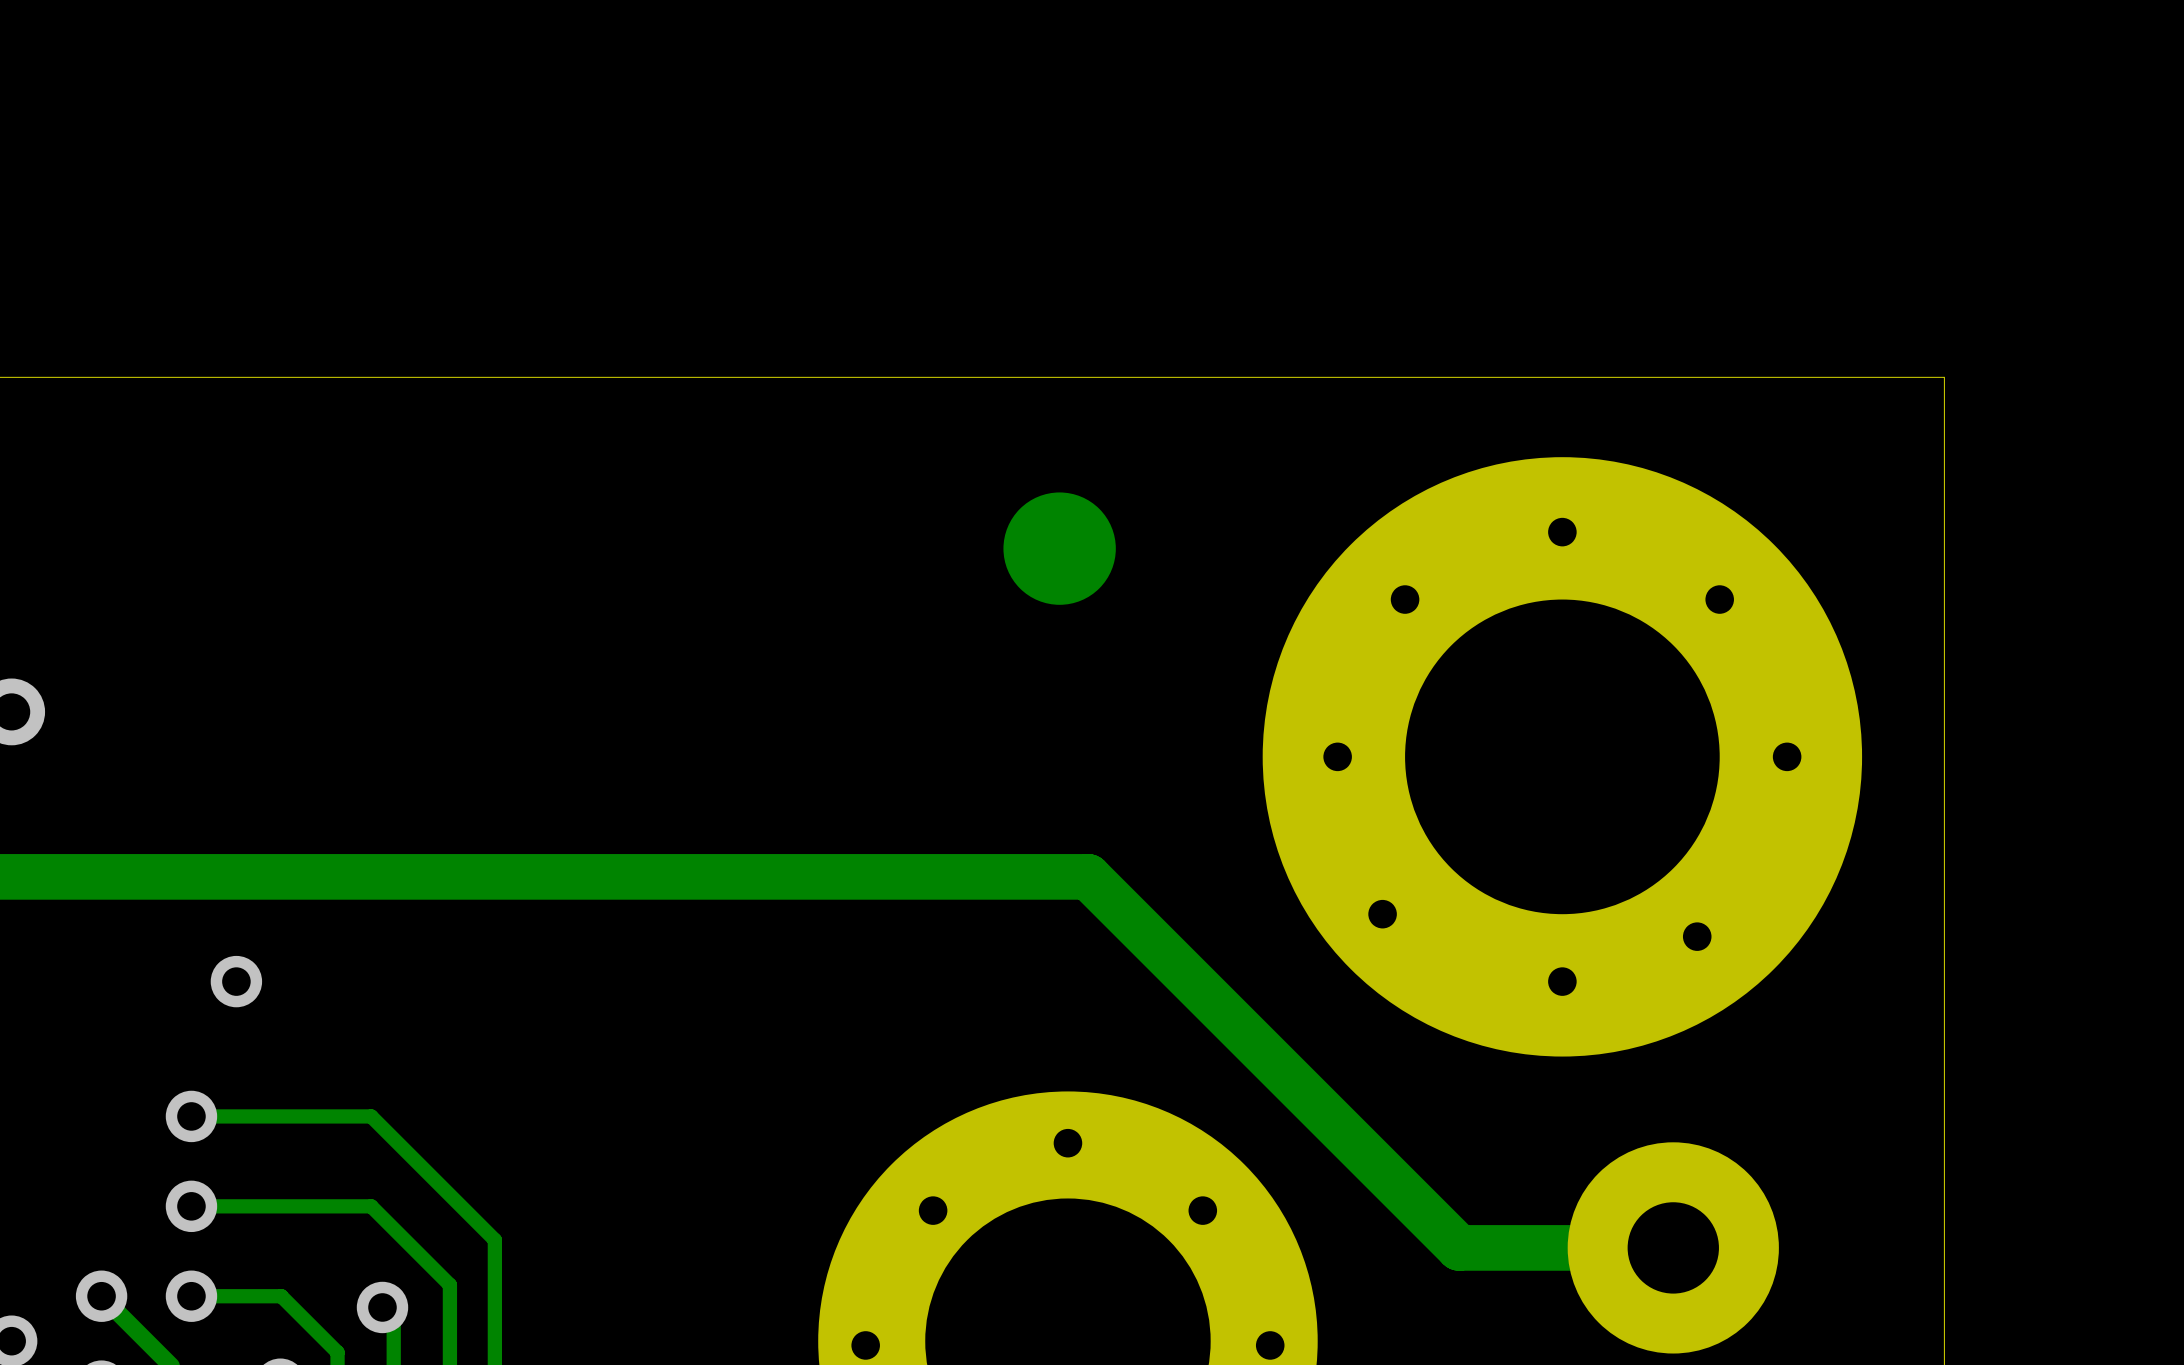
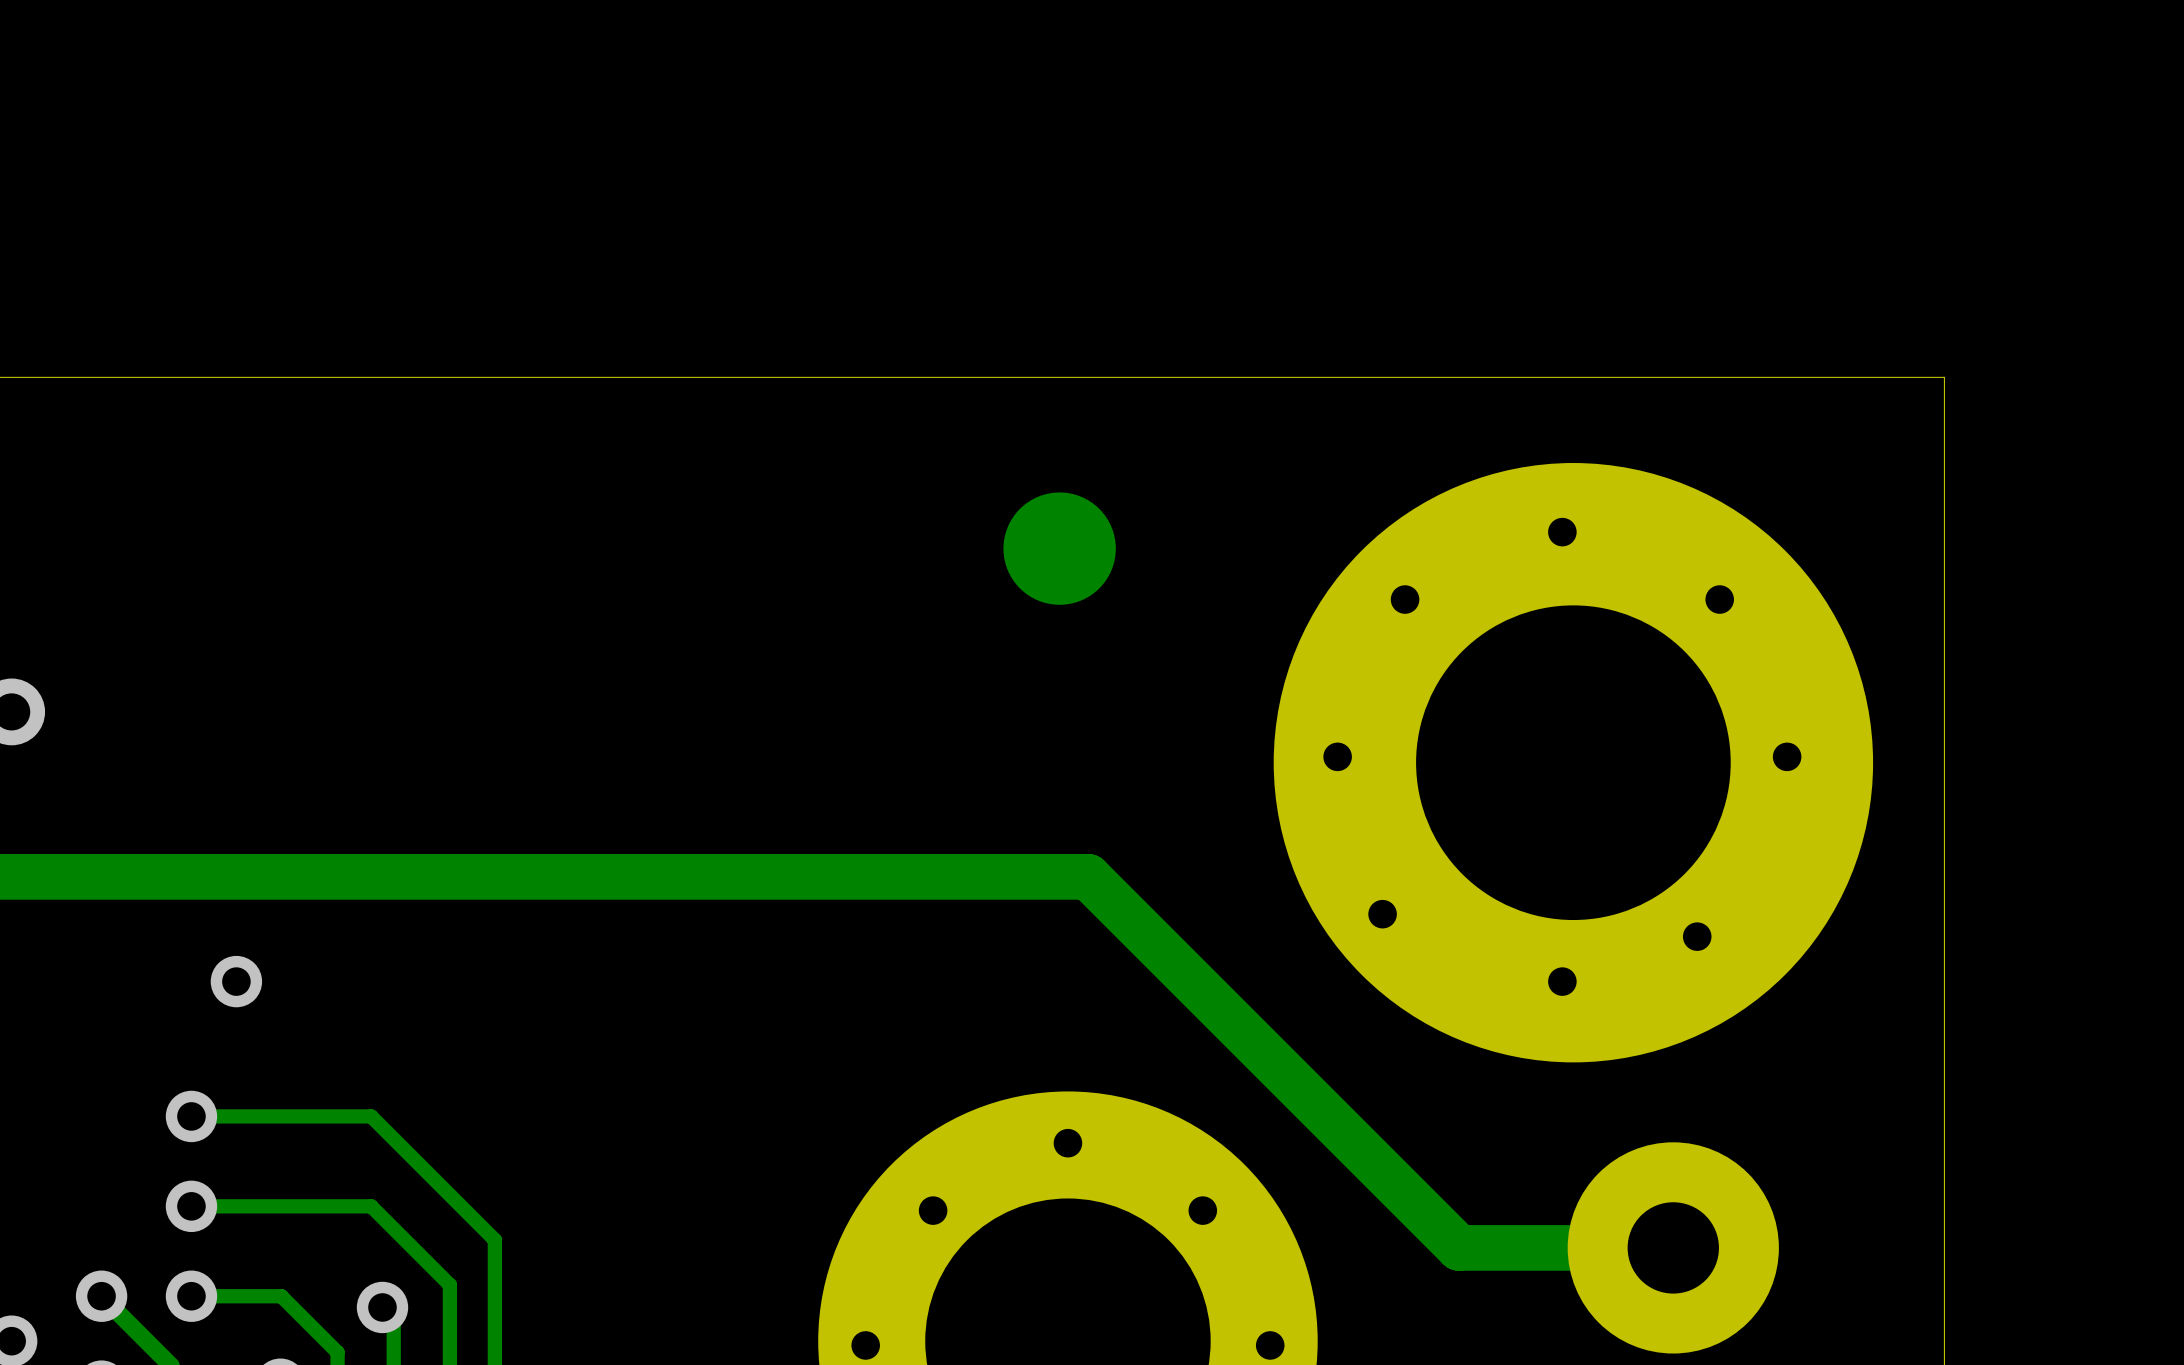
part position: (1562, 756) -> (1573, 762)

